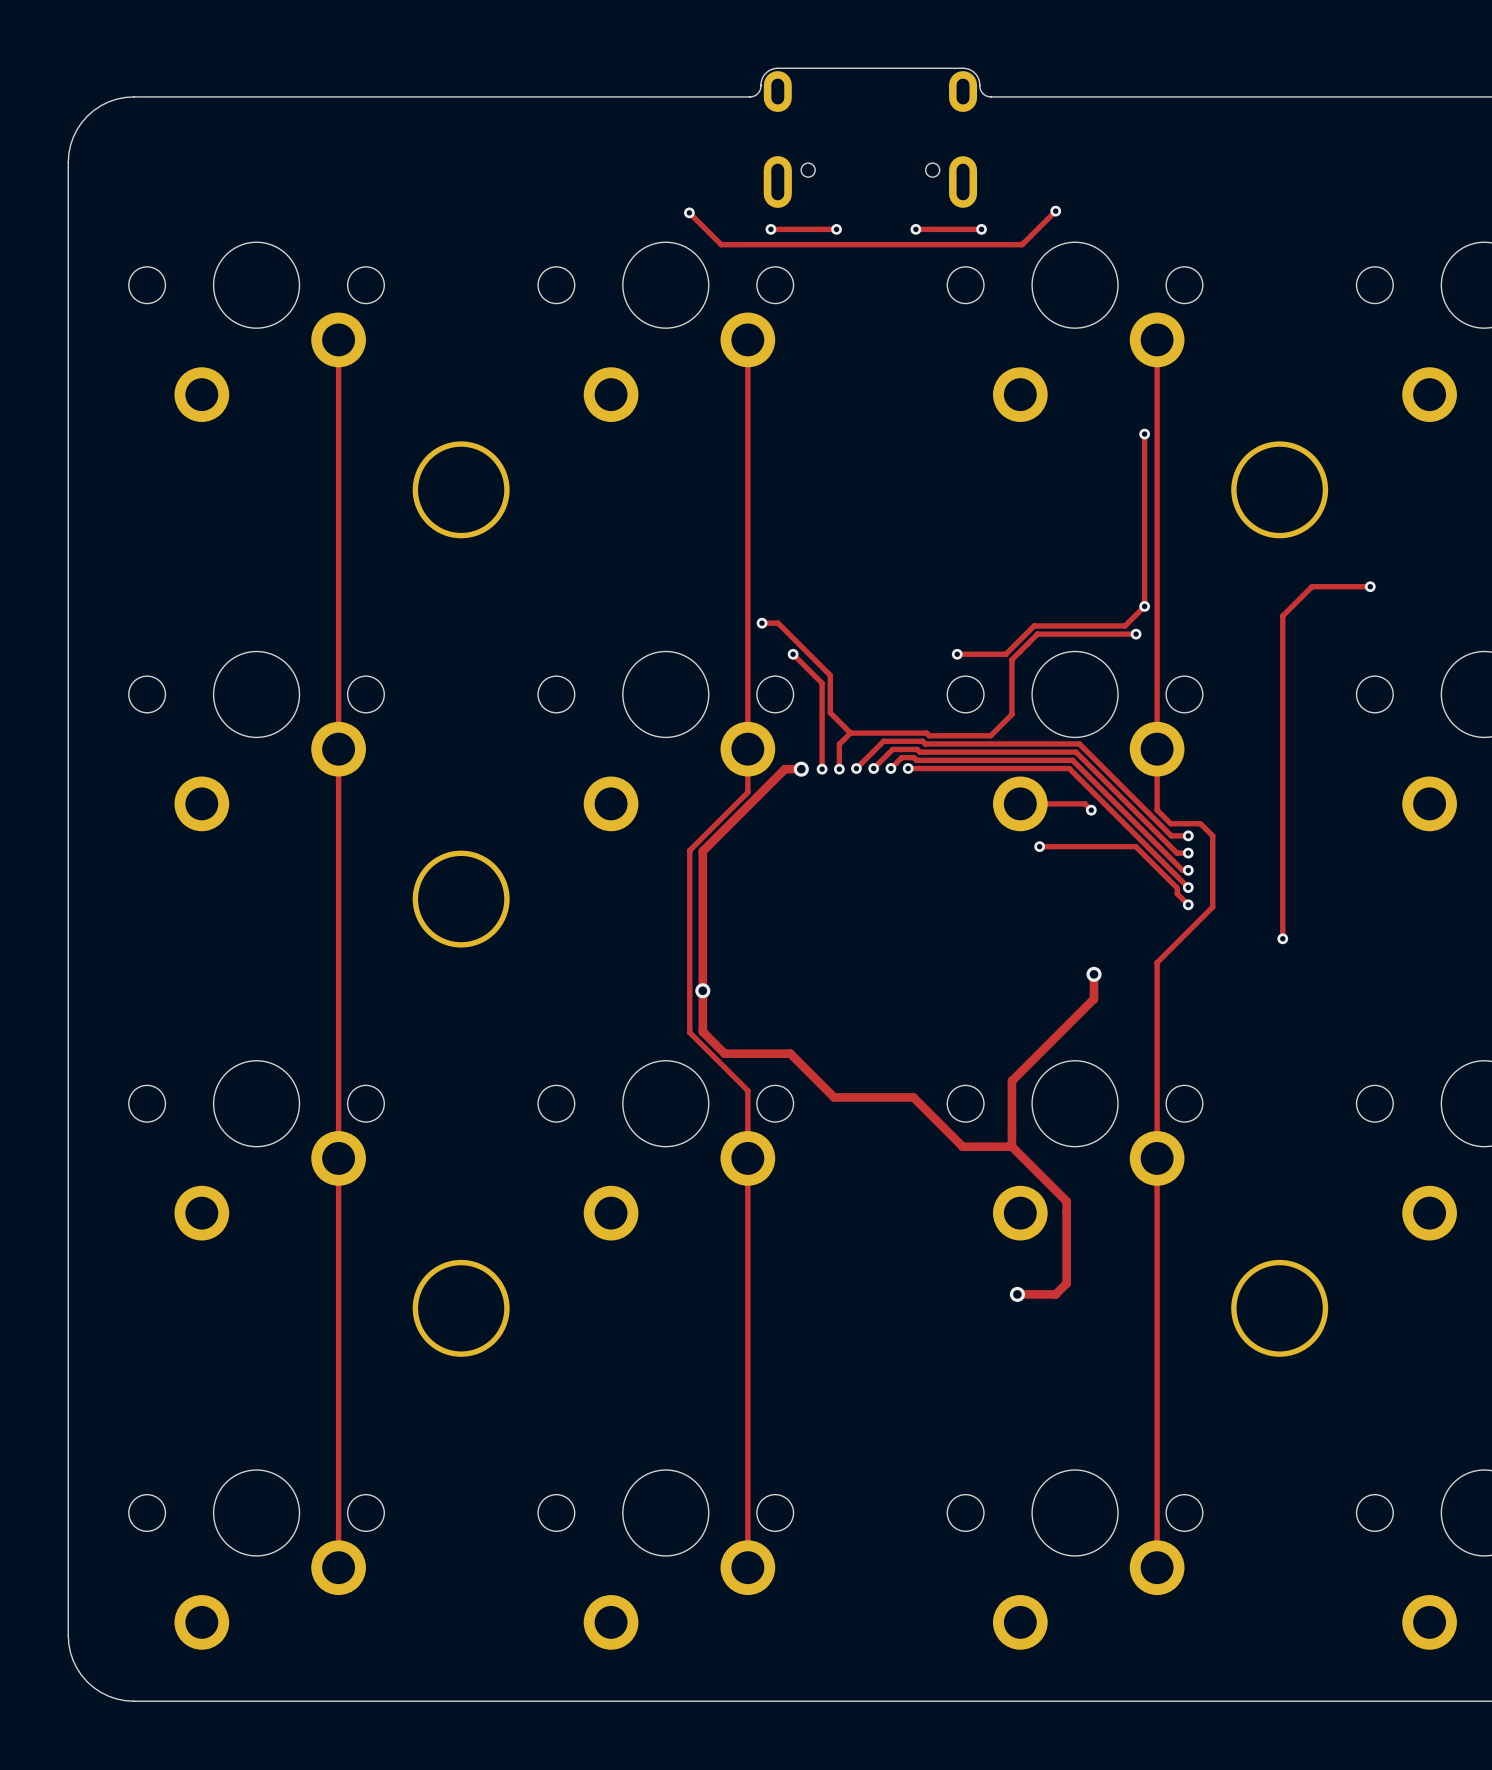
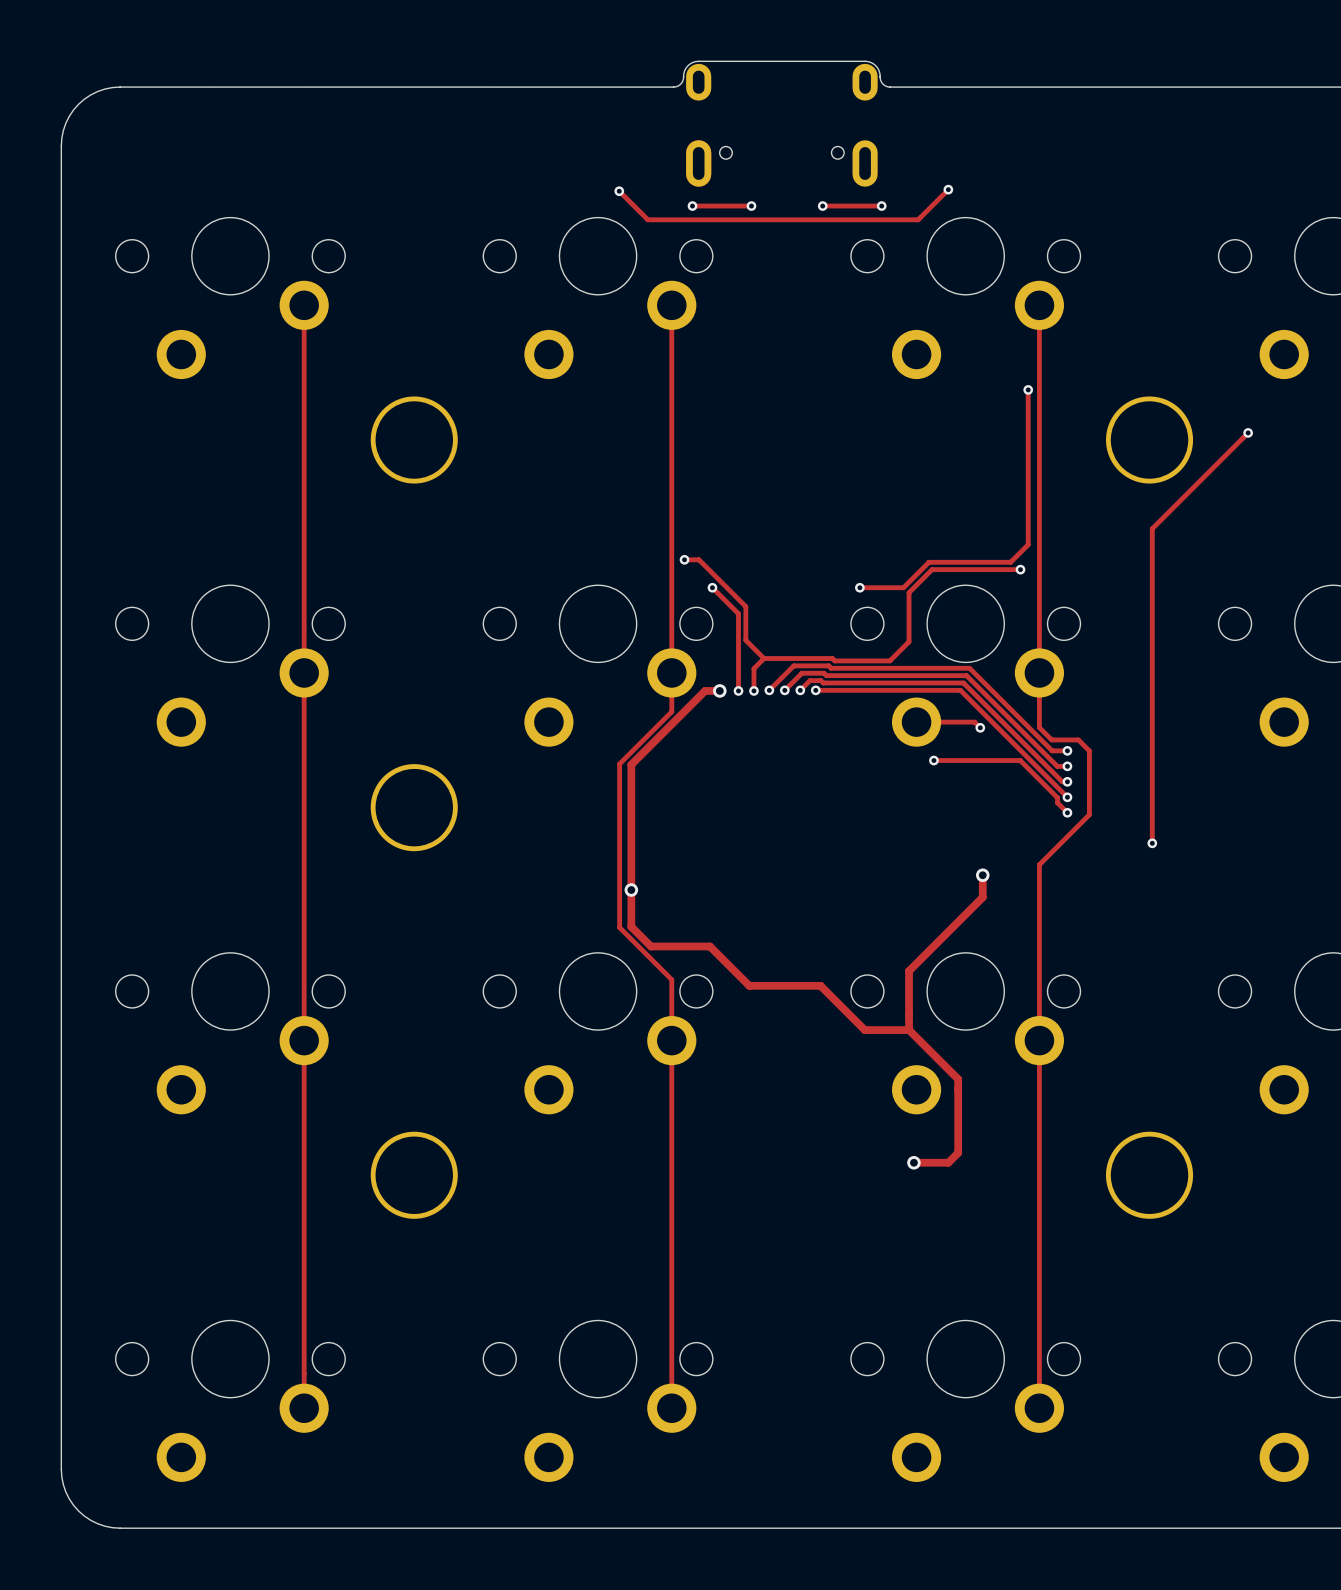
track: (1370, 586) (1312, 586) (1282, 615) -> (1248, 432) (1152, 528) (1152, 553)
via position: (1370, 586) -> (1248, 432)
via: (1144, 606) -> none

